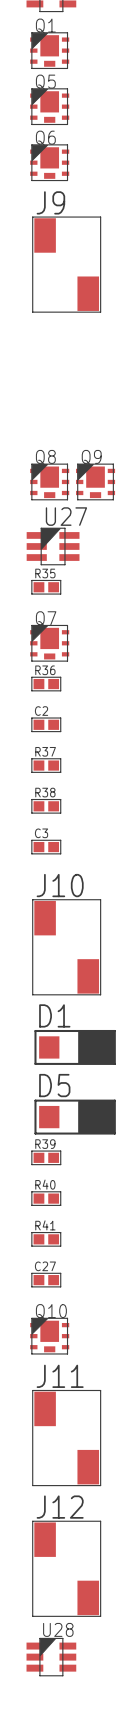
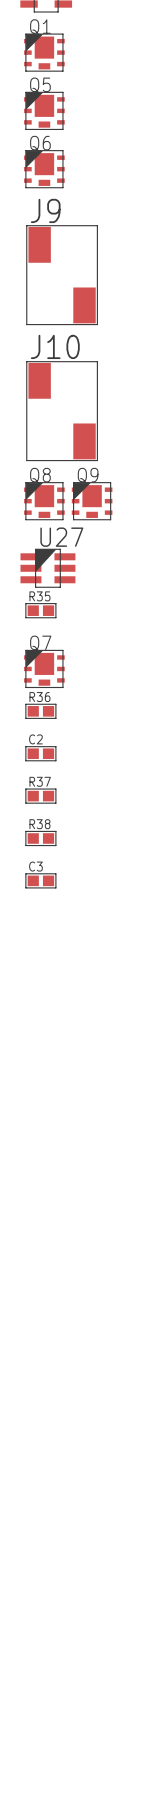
J10 position: (66, 947) -> (62, 411)
D1: (75, 1047) -> none
D5: (75, 1117) -> none
R39: (46, 1157) -> none
R40: (46, 1198) -> none
R41: (46, 1239) -> none
C27: (46, 1280) -> none
Q10: (49, 1336) -> none
J11: (66, 1438) -> none
J12: (66, 1568) -> none
U28: (51, 1657) -> none

